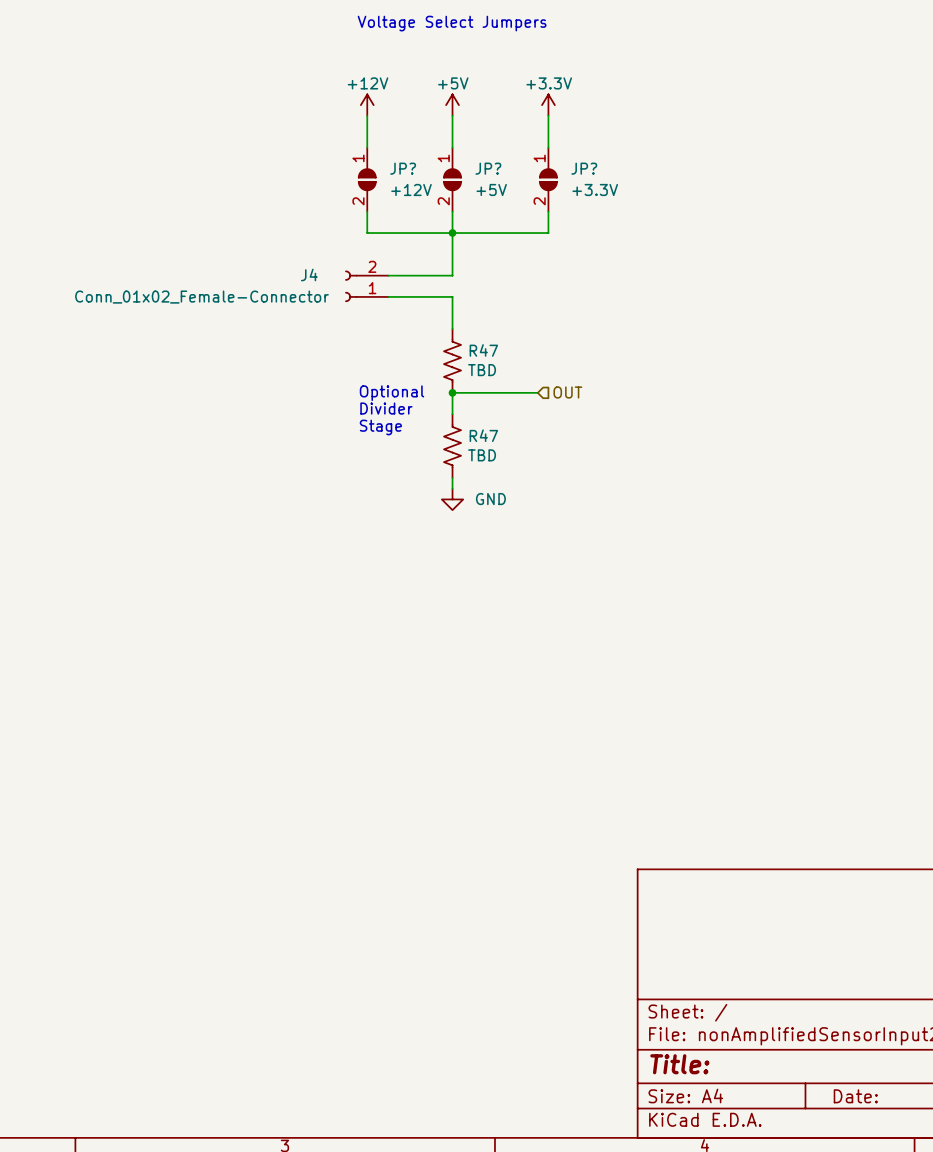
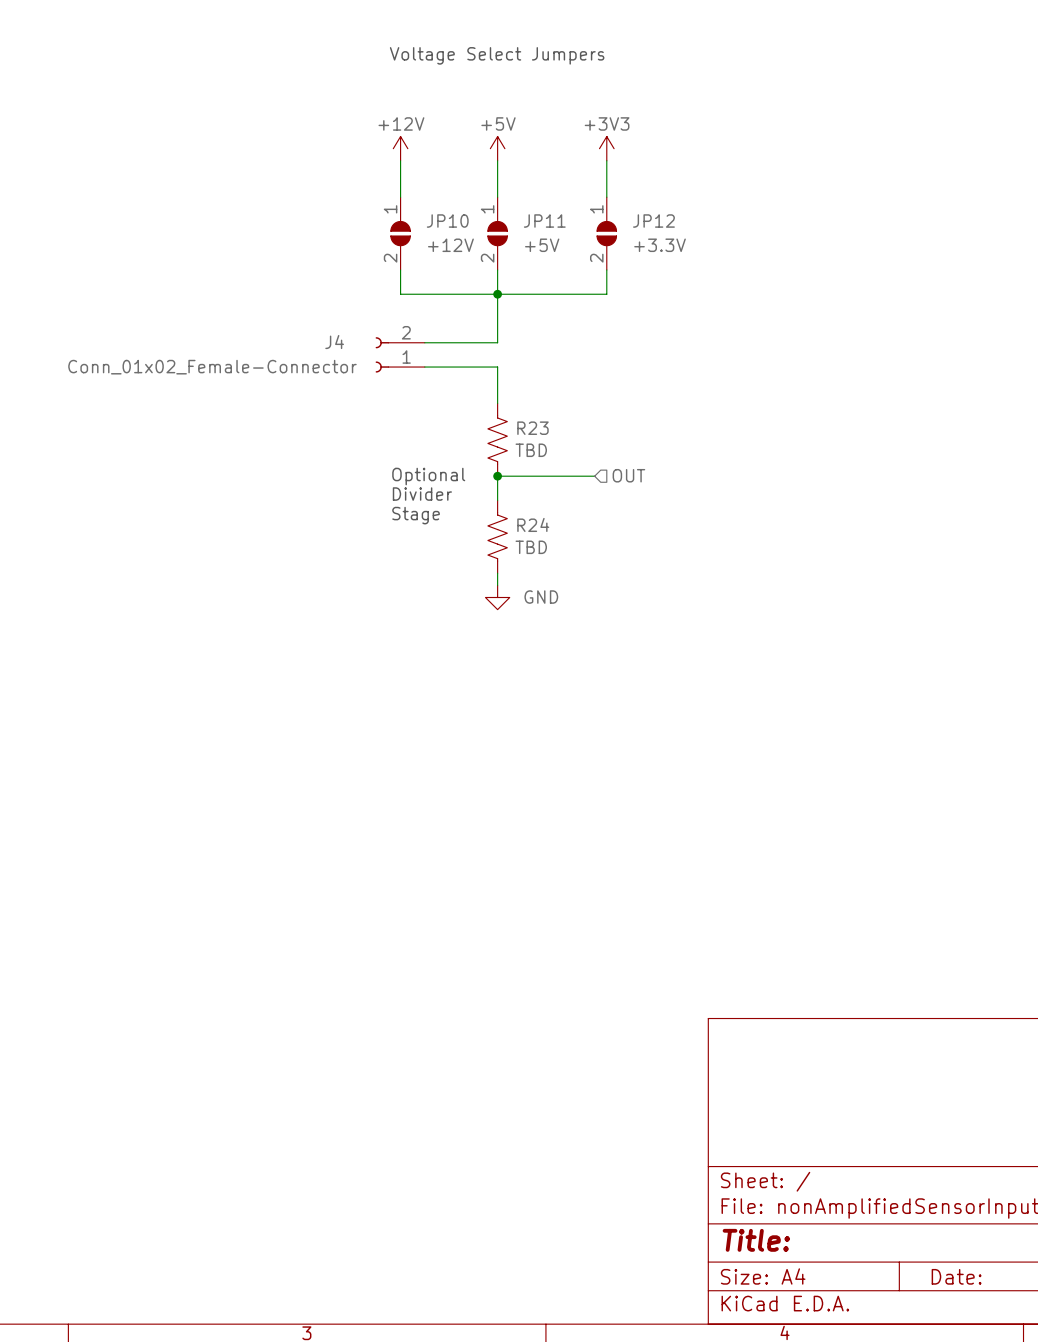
power symbol: +3.3V (548, 105) -> +3V3 (606, 148)
JP? name: JP? (403, 168) -> JP10 (447, 221)
JP? name: JP? (488, 168) -> JP11 (544, 221)
JP? name: JP? (584, 168) -> JP12 (653, 221)
R47 name: R47 (483, 350) -> R23 (532, 428)
R47 name: R47 (483, 435) -> R24 (533, 524)

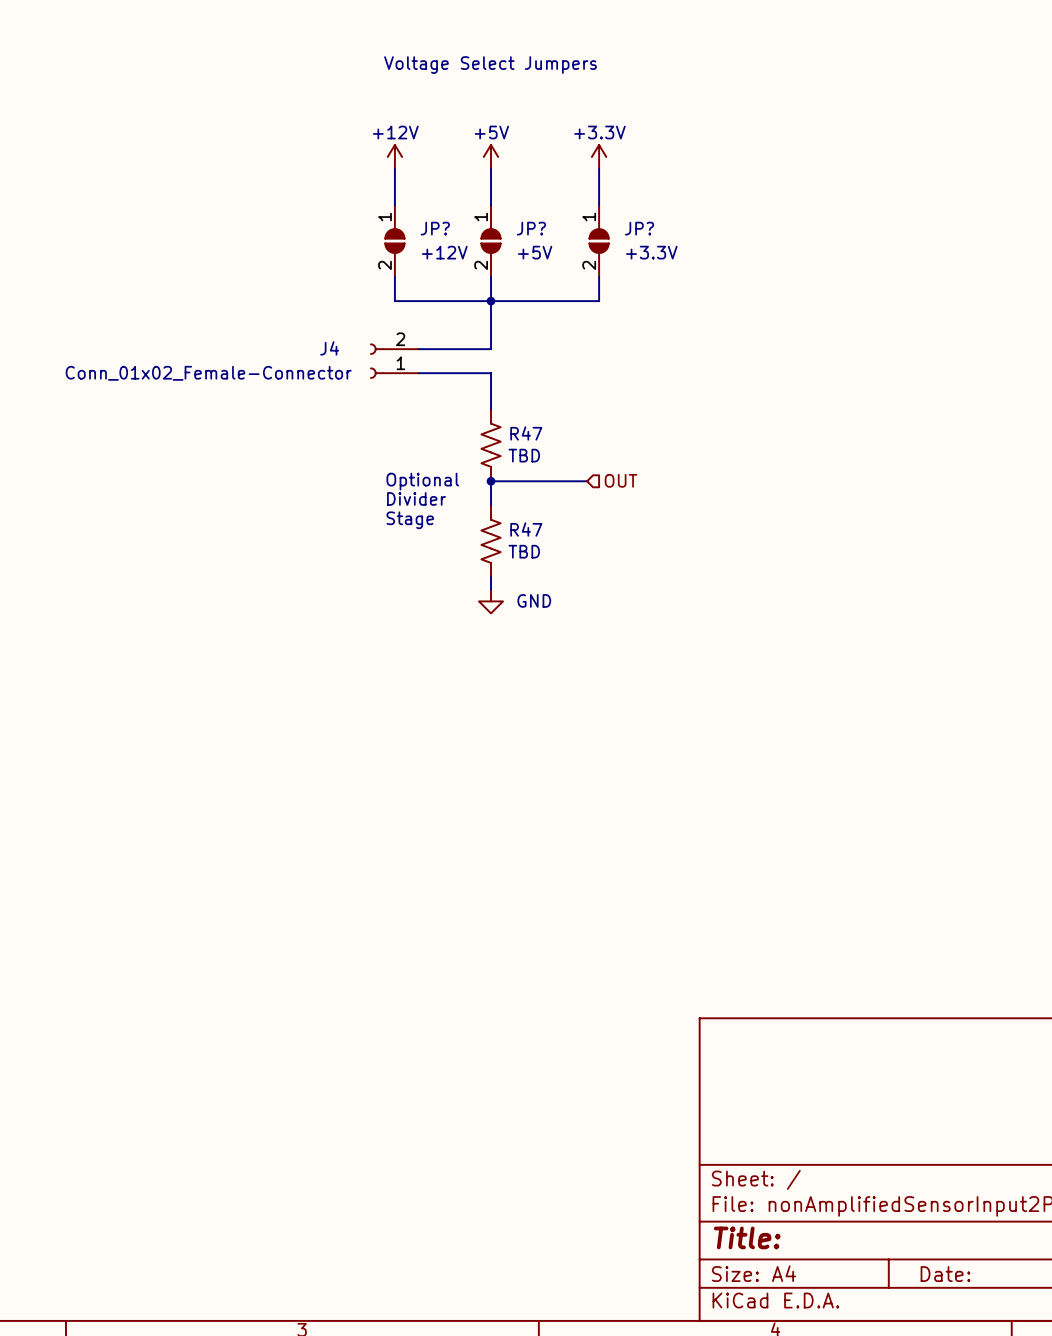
power symbol: +3V3 (606, 148) -> +3.3V (599, 156)
JP10 name: JP10 (447, 221) -> JP? (435, 228)
JP11 name: JP11 (544, 221) -> JP? (531, 228)
JP12 name: JP12 (653, 221) -> JP? (639, 228)
R23 name: R23 (532, 428) -> R47 (526, 433)
R24 name: R24 (533, 524) -> R47 (526, 529)

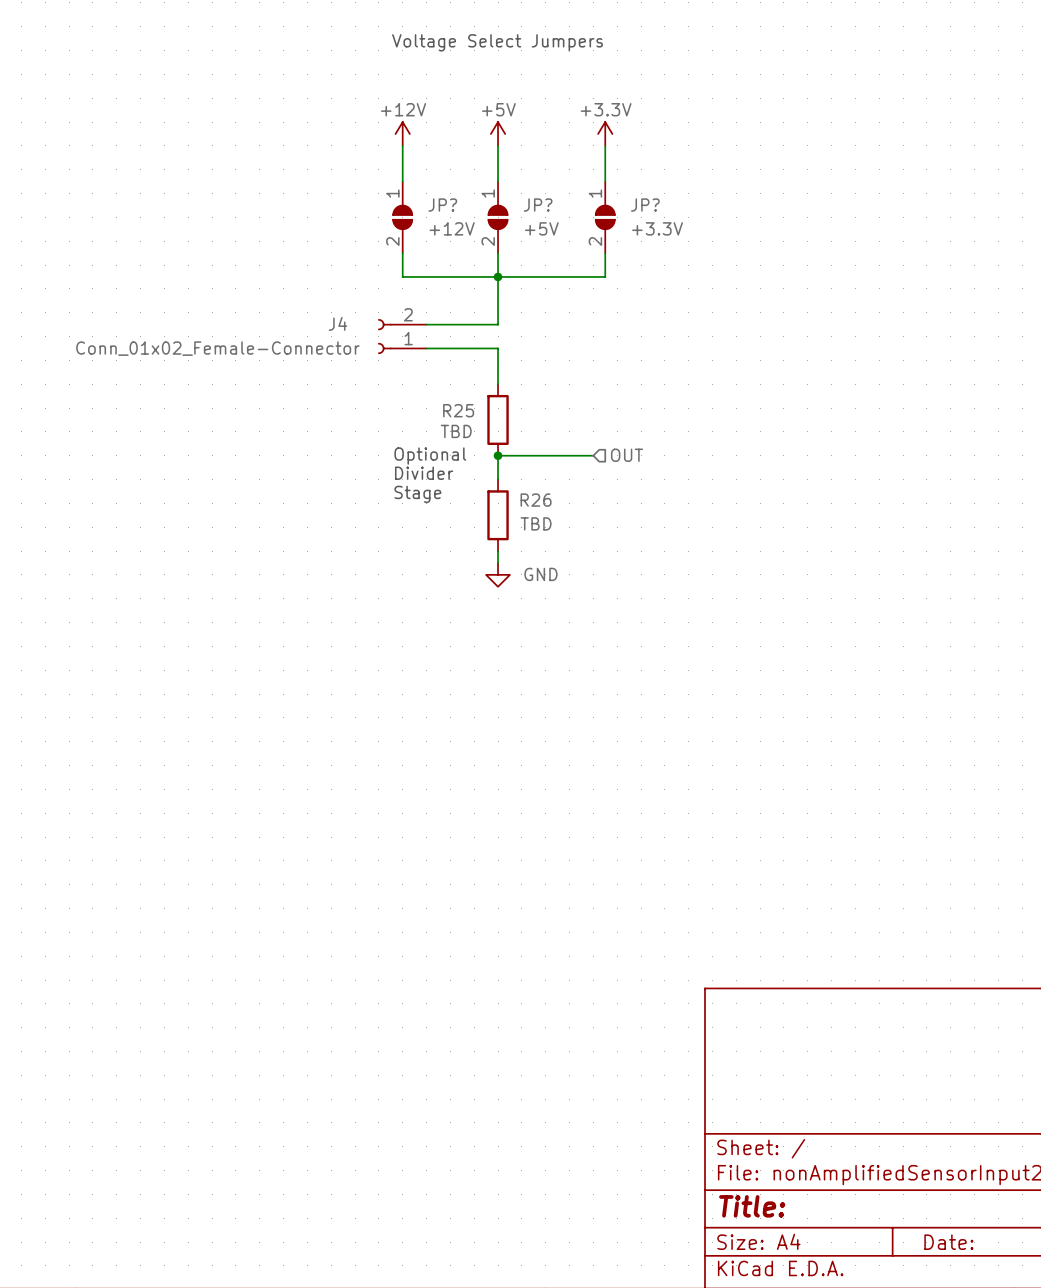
R47: TBD (491, 445) -> none
R25: none -> TBD (498, 419)
R47: TBD (491, 541) -> none
R26: none -> TBD (498, 515)

